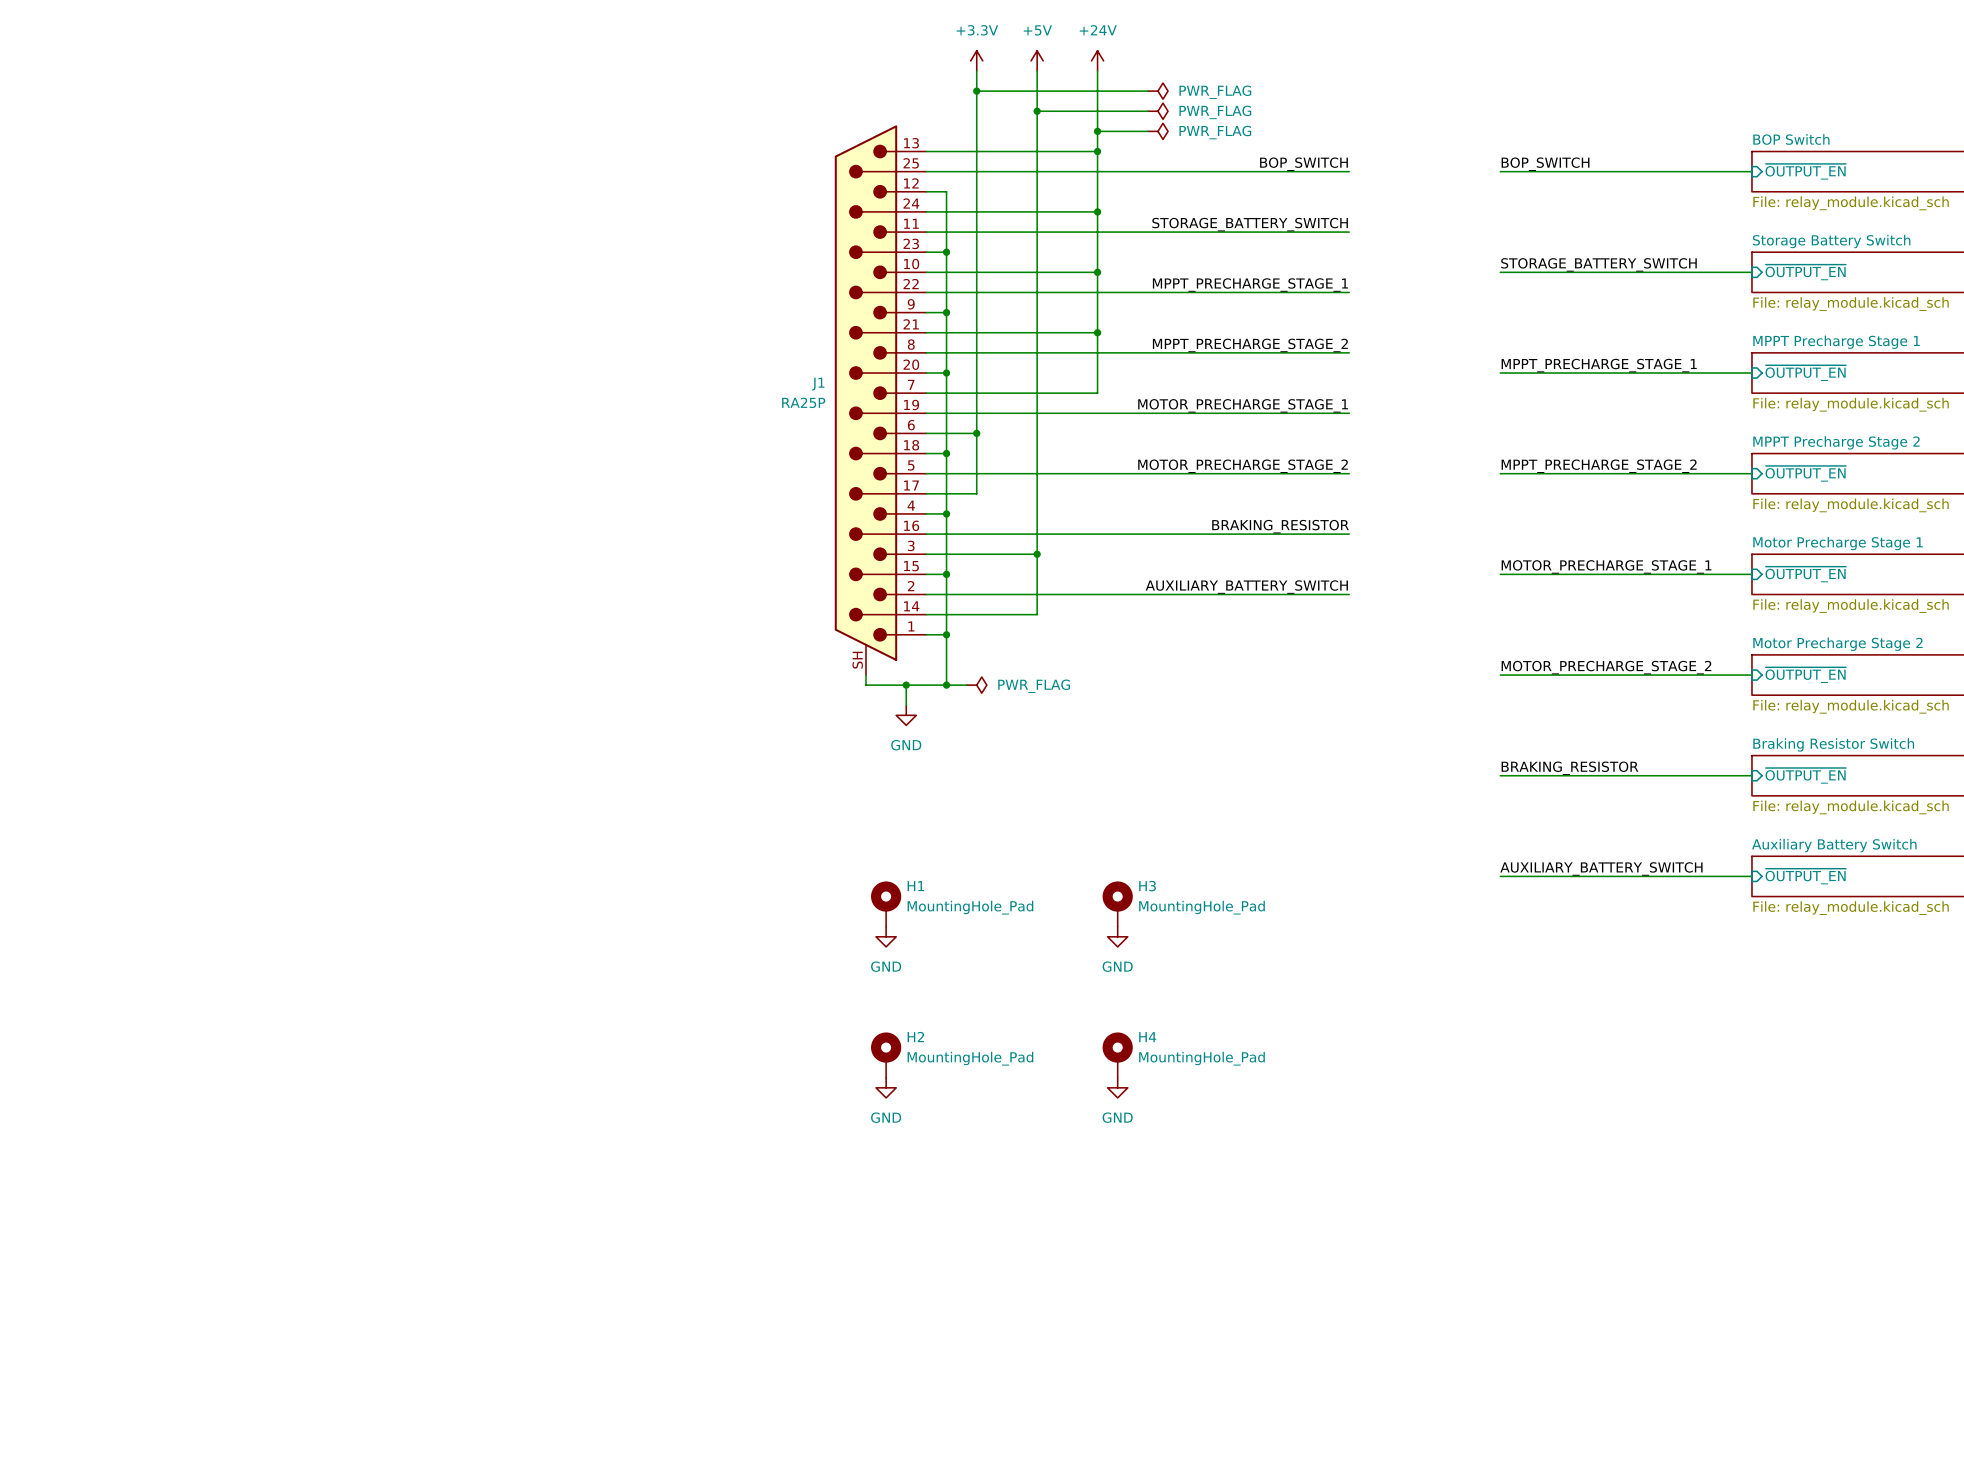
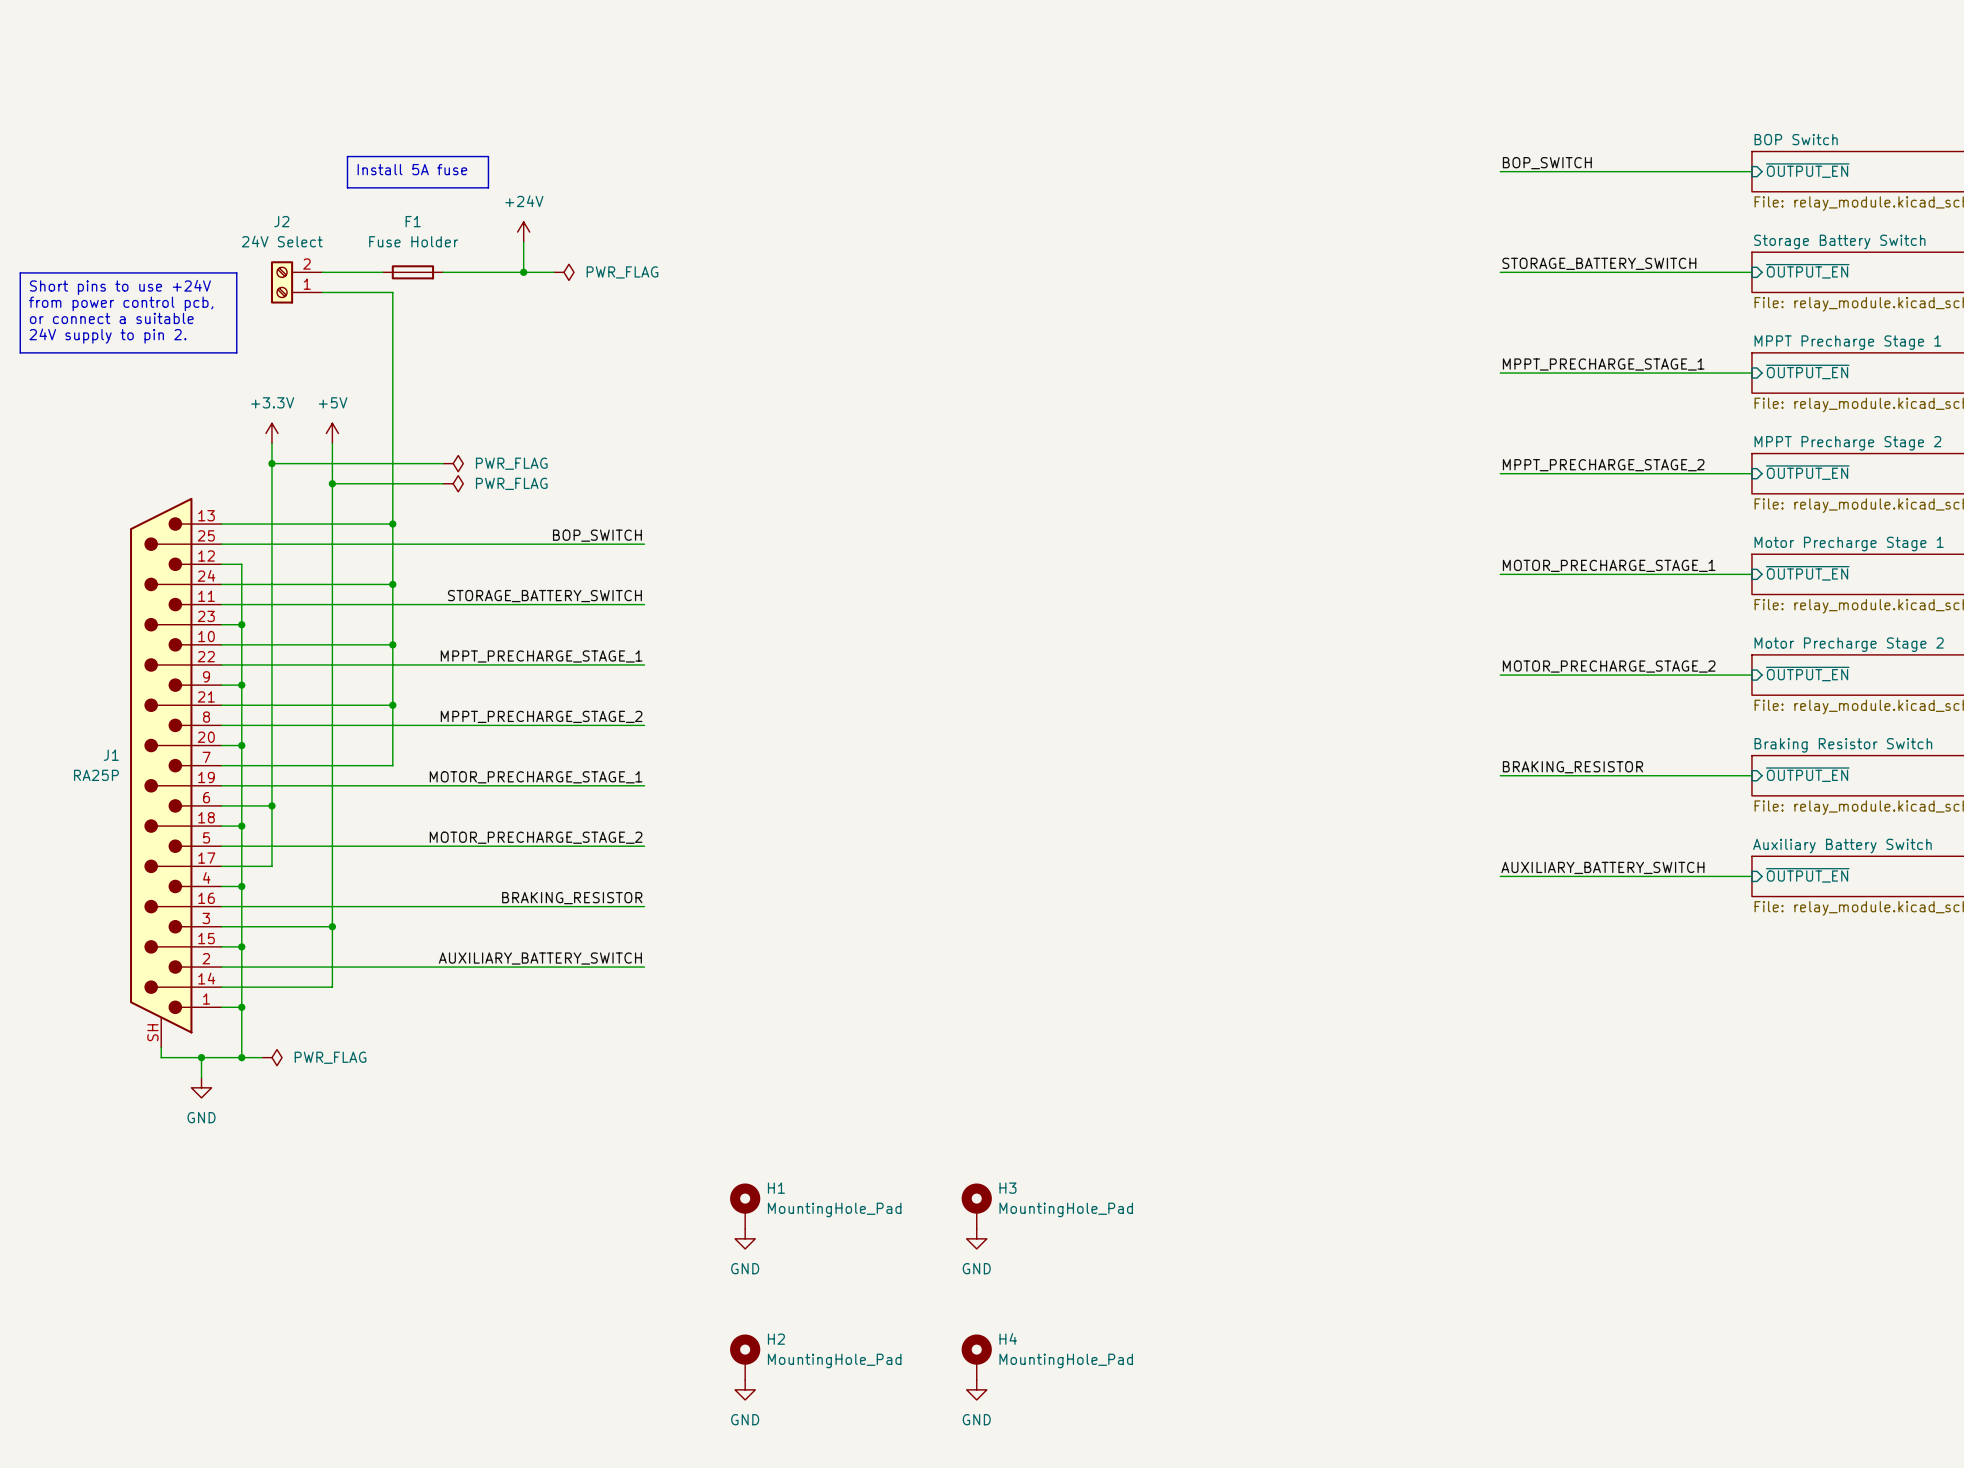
power symbol: +3.3V (976, 60) -> none
power symbol: +5V (1037, 60) -> none
power symbol: +24V (1097, 60) -> none
wire: (976, 70) (976, 493) (926, 493) -> none
wire: (1037, 70) (1037, 614) (926, 614) -> none
wire: (1097, 70) (1097, 393) (926, 393) -> none
wire: (976, 91) (1147, 91) -> none
junction: (976, 91) -> none
power symbol: PWR_FLAG (1157, 91) -> none
wire: (1037, 111) (1147, 111) -> none
junction: (1037, 111) -> none
power symbol: PWR_FLAG (1157, 111) -> none
wire: (1097, 131) (1147, 131) -> none
junction: (1097, 131) -> none
power symbol: PWR_FLAG (1157, 131) -> none
wire: (926, 151) (1097, 151) -> none
junction: (1097, 151) -> none
line: none -> (347, 156) (488, 156) (488, 187) (347, 187) (347, 156)
label: BOP_SWITCH (1303, 164) -> none
text: none -> Install 5A fuse (412, 169)
wire: (926, 171) (1349, 171) -> none
wire: (926, 191) (946, 191) (946, 685) -> none
wire: (926, 211) (1097, 211) -> none
junction: (1097, 211) -> none
label: STORAGE_BATTERY_SWITCH (1250, 224) -> none
power symbol: none -> +24V (523, 232)
wire: (926, 232) (1349, 232) -> none
wire: none -> (523, 242) (523, 272)
wire: (926, 252) (946, 252) -> none
junction: (946, 252) -> none
line: none -> (20, 272) (236, 272) (236, 352) (20, 352) (20, 272)
wire: none -> (322, 272) (382, 272)
F1: none -> Fuse Holder (412, 272)
wire: none -> (443, 272) (553, 272)
junction: none -> (523, 272)
power symbol: none -> PWR_FLAG (563, 272)
wire: (926, 272) (1097, 272) -> none
junction: (1097, 272) -> none
J2: none -> 24V Select (296, 282)
label: MPPT_PRECHARGE_STAGE_1 (1250, 285) -> none
text: none -> Short pins to use +24V (120, 287)
wire: none -> (322, 292) (392, 292) (392, 765) (221, 765)
wire: (926, 292) (1349, 292) -> none
text: none -> from power control pcb, (121, 303)
wire: (926, 312) (946, 312) -> none
junction: (946, 312) -> none
text: none -> or connect a suitable (111, 318)
wire: (926, 332) (1097, 332) -> none
junction: (1097, 332) -> none
text: none -> 24V supply to pin 2. (107, 336)
label: MPPT_PRECHARGE_STAGE_2 (1250, 345) -> none
wire: (926, 352) (1349, 352) -> none
wire: (926, 373) (946, 373) -> none
junction: (946, 373) -> none
J1 position: (880, 400) -> (175, 772)
label: MOTOR_PRECHARGE_STAGE_1 (1243, 405) -> none
wire: (926, 413) (1349, 413) -> none
power symbol: none -> +3.3V (271, 433)
power symbol: none -> +5V (332, 433)
wire: (926, 433) (976, 433) -> none
junction: (976, 433) -> none
wire: none -> (271, 443) (271, 866) (221, 866)
wire: none -> (332, 443) (332, 987) (221, 987)
wire: (926, 453) (946, 453) -> none
junction: (946, 453) -> none
wire: none -> (271, 463) (443, 463)
junction: none -> (271, 463)
power symbol: none -> PWR_FLAG (453, 463)
label: MOTOR_PRECHARGE_STAGE_2 (1243, 466) -> none
wire: (926, 473) (1349, 473) -> none
wire: none -> (332, 483) (443, 483)
junction: none -> (332, 483)
power symbol: none -> PWR_FLAG (453, 483)
wire: (926, 513) (946, 513) -> none
junction: (946, 513) -> none
wire: none -> (221, 524) (392, 524)
junction: none -> (392, 524)
label: BRAKING_RESISTOR (1280, 526) -> none
wire: (926, 534) (1349, 534) -> none
label: none -> BOP_SWITCH (597, 535)
wire: none -> (221, 544) (644, 544)
wire: (926, 554) (1037, 554) -> none
junction: (1037, 554) -> none
wire: none -> (221, 564) (241, 564) (241, 1057)
wire: (926, 574) (946, 574) -> none
junction: (946, 574) -> none
wire: none -> (221, 584) (392, 584)
junction: none -> (392, 584)
label: AUXILIARY_BATTERY_SWITCH (1246, 587) -> none
wire: (926, 594) (1349, 594) -> none
label: none -> STORAGE_BATTERY_SWITCH (544, 596)
wire: none -> (221, 604) (644, 604)
wire: none -> (221, 624) (241, 624)
junction: none -> (241, 624)
wire: (926, 634) (946, 634) -> none
junction: (946, 634) -> none
wire: none -> (221, 644) (392, 644)
junction: none -> (392, 644)
label: none -> MPPT_PRECHARGE_STAGE_1 (541, 656)
wire: none -> (221, 664) (644, 664)
wire: (865, 675) (865, 685) (966, 685) -> none
wire: none -> (221, 685) (241, 685)
junction: none -> (241, 685)
wire: (906, 685) (906, 705) -> none
junction: (906, 685) -> none
junction: (946, 685) -> none
power symbol: PWR_FLAG (976, 685) -> none
wire: none -> (221, 705) (392, 705)
junction: none -> (392, 705)
power symbol: GND (906, 715) -> none
label: none -> MPPT_PRECHARGE_STAGE_2 (541, 716)
wire: none -> (221, 725) (644, 725)
wire: none -> (221, 745) (241, 745)
junction: none -> (241, 745)
label: none -> MOTOR_PRECHARGE_STAGE_1 (536, 777)
wire: none -> (221, 785) (644, 785)
wire: none -> (221, 805) (271, 805)
junction: none -> (271, 805)
wire: none -> (221, 826) (241, 826)
junction: none -> (241, 826)
label: none -> MOTOR_PRECHARGE_STAGE_2 (536, 837)
wire: none -> (221, 846) (644, 846)
wire: none -> (221, 886) (241, 886)
junction: none -> (241, 886)
label: none -> BRAKING_RESISTOR (572, 898)
H1 position: (886, 904) -> (745, 1206)
H3 position: (1117, 904) -> (976, 1206)
wire: none -> (221, 906) (644, 906)
wire: none -> (221, 926) (332, 926)
junction: none -> (332, 926)
power symbol: GND (886, 936) -> none
power symbol: GND (1117, 936) -> none
wire: none -> (221, 946) (241, 946)
junction: none -> (241, 946)
label: none -> AUXILIARY_BATTERY_SWITCH (540, 958)
wire: none -> (221, 967) (644, 967)
wire: none -> (221, 1007) (241, 1007)
junction: none -> (241, 1007)
wire: none -> (161, 1047) (161, 1057) (261, 1057)
H2 position: (886, 1055) -> (745, 1357)
H4 position: (1117, 1055) -> (976, 1357)
wire: none -> (201, 1057) (201, 1077)
junction: none -> (201, 1057)
junction: none -> (241, 1057)
power symbol: none -> PWR_FLAG (271, 1057)
power symbol: none -> GND (201, 1087)
power symbol: GND (886, 1087) -> none
power symbol: GND (1117, 1087) -> none
power symbol: none -> GND (745, 1238)
power symbol: none -> GND (976, 1238)
power symbol: none -> GND (745, 1389)
power symbol: none -> GND (976, 1389)

